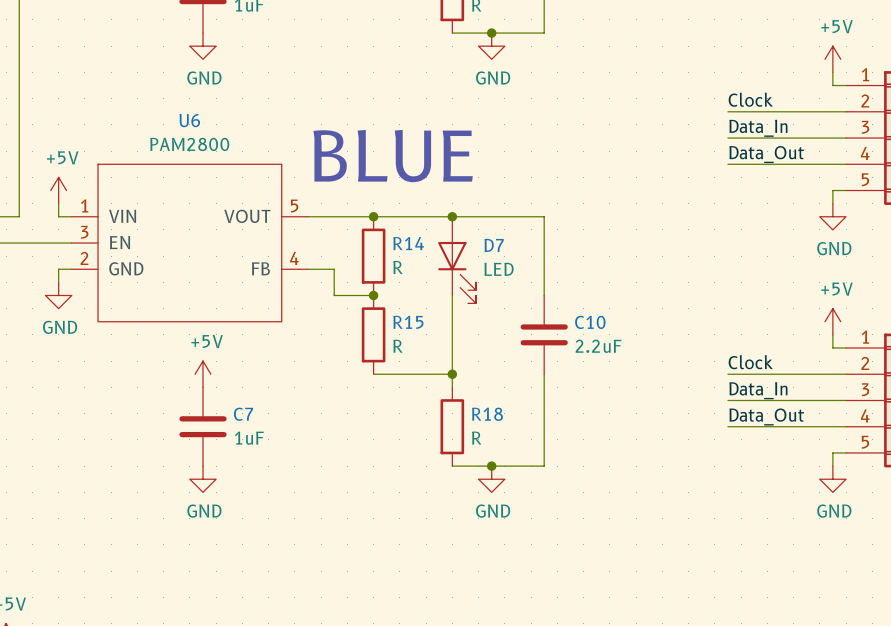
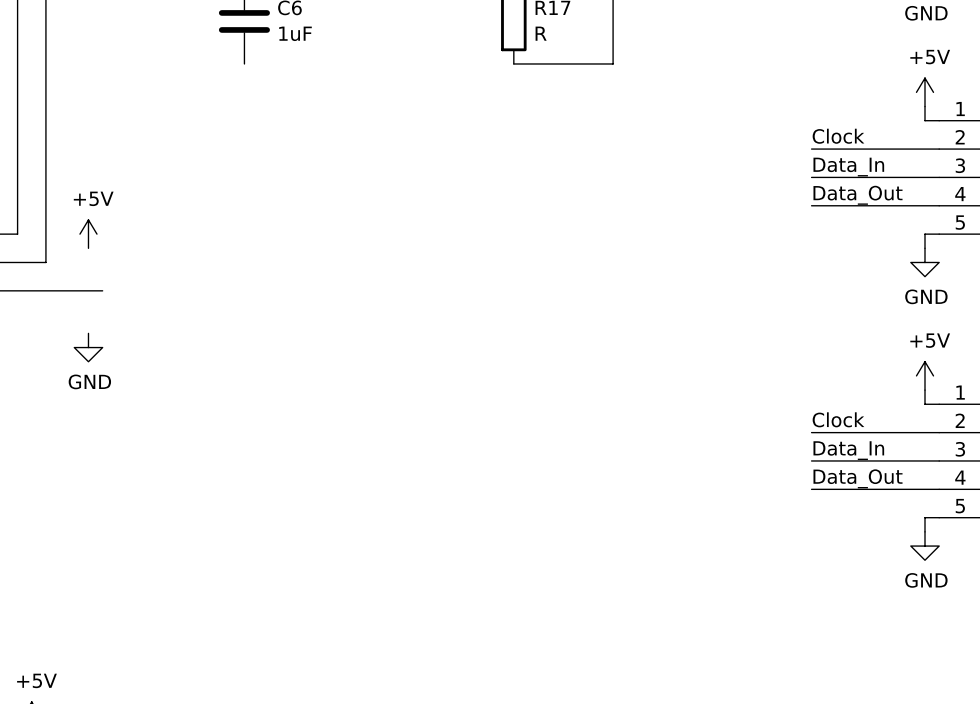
junction: (491, 33) -> none
power symbol: GND (202, 46) -> none
power symbol: GND (491, 46) -> none
text: BLUE (393, 156) -> none
wire: (58, 203) (58, 216) (71, 216) -> none
wire: (307, 216) (544, 216) (544, 295) -> none
junction: (373, 216) -> none
junction: (452, 216) -> none
U6: PAM2800 (189, 243) -> none
R14: R (373, 256) -> none
D7: LED (457, 260) -> none
wire: (71, 269) (58, 269) (58, 282) -> none
wire: (307, 269) (334, 269) (334, 295) (373, 295) -> none
junction: (373, 295) -> none
wire: (452, 295) (452, 387) -> none
R15: R (373, 334) -> none
C10: 2.2uF (544, 334) -> none
power symbol: +5V (202, 374) -> none
wire: (373, 374) (452, 374) -> none
junction: (452, 374) -> none
wire: (544, 374) (544, 466) (452, 466) -> none
C7: 1uF (202, 426) -> none
R18: R (452, 426) -> none
junction: (491, 466) -> none
power symbol: GND (202, 479) -> none
power symbol: GND (491, 479) -> none

